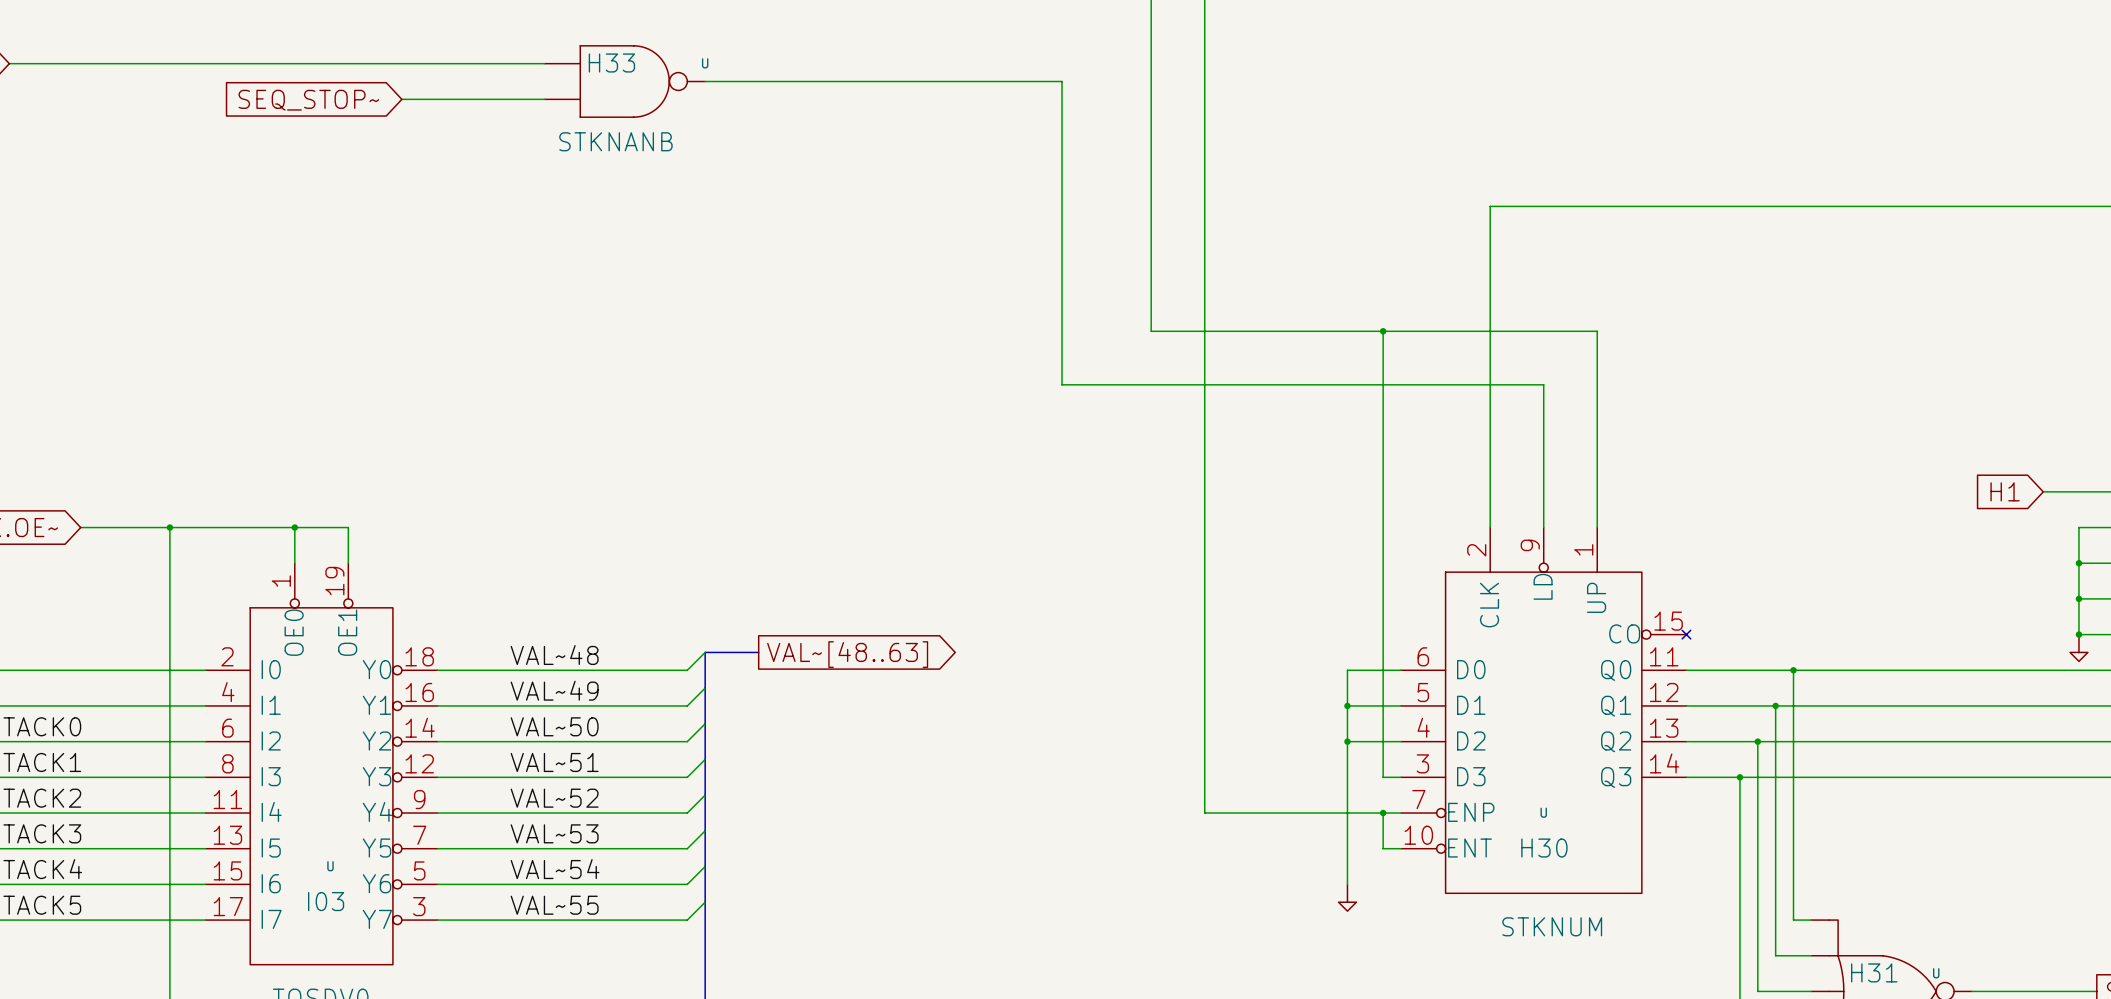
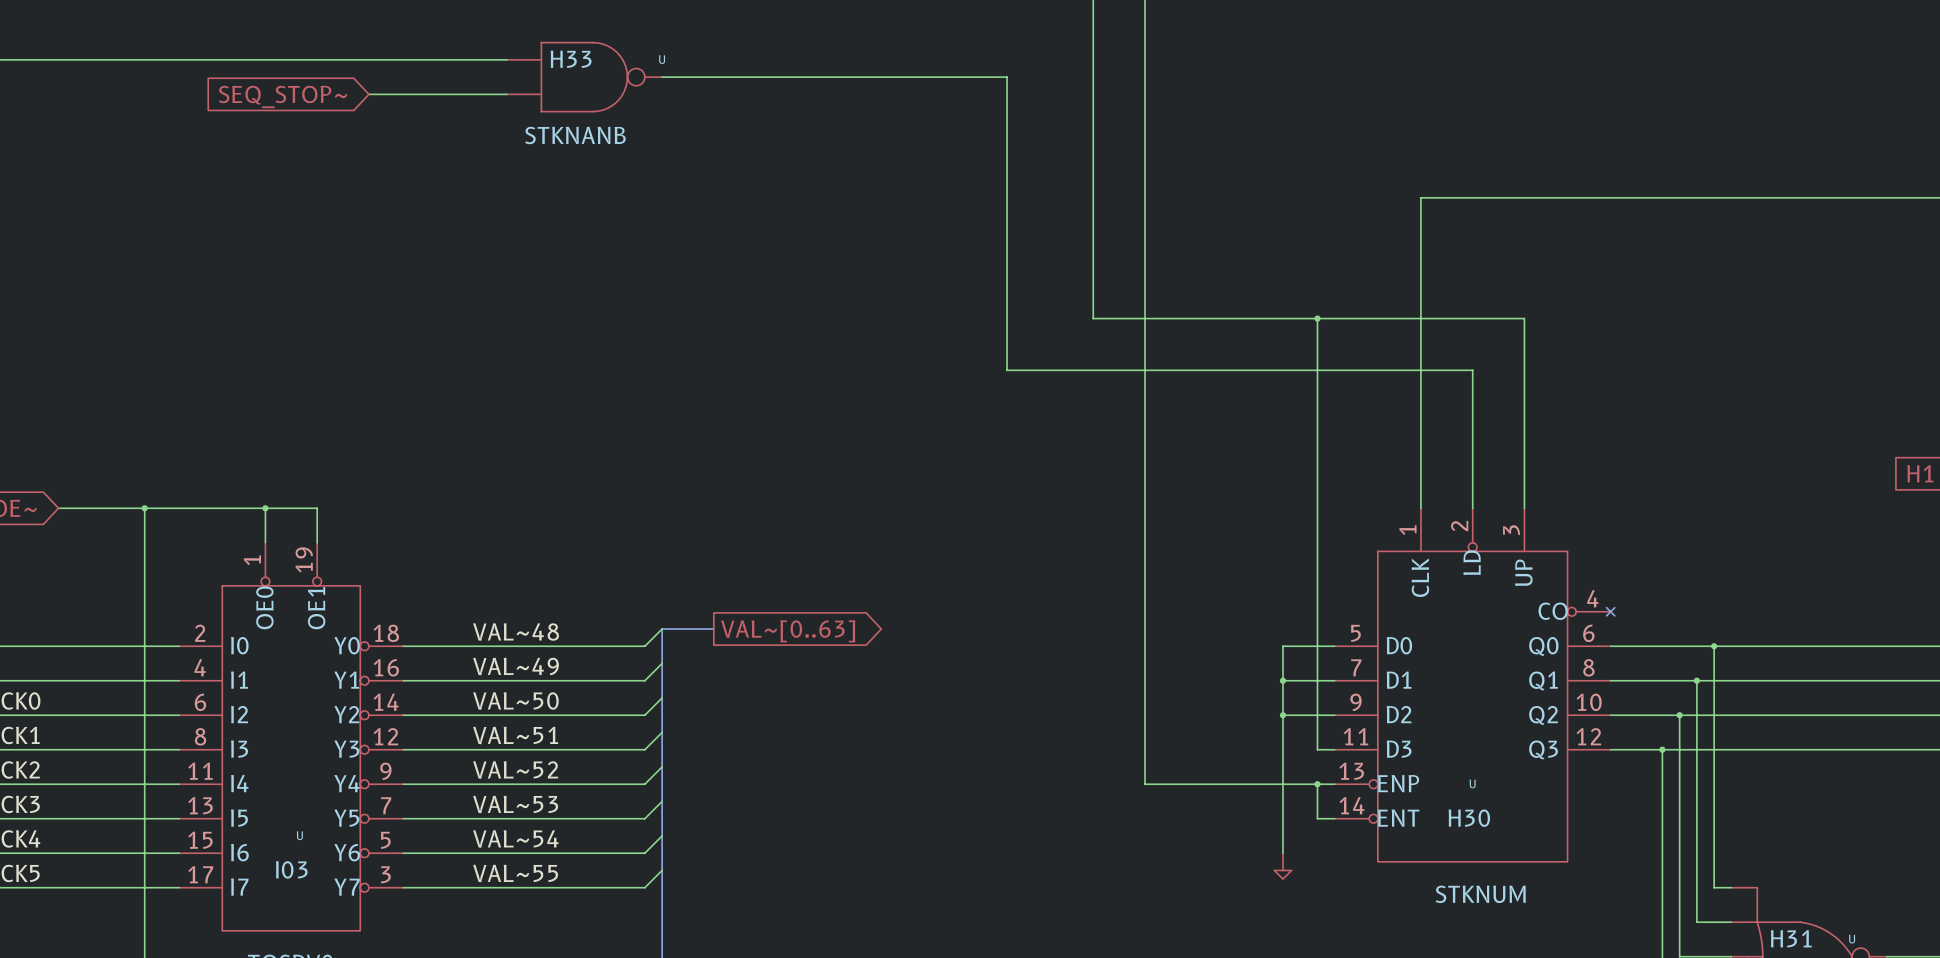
U symbol: [1400, 527, 1687, 894] -> [1334, 508, 1611, 862]
global label: VAL~[48..63] (847, 654) -> VAL~[0..63] (788, 631)

